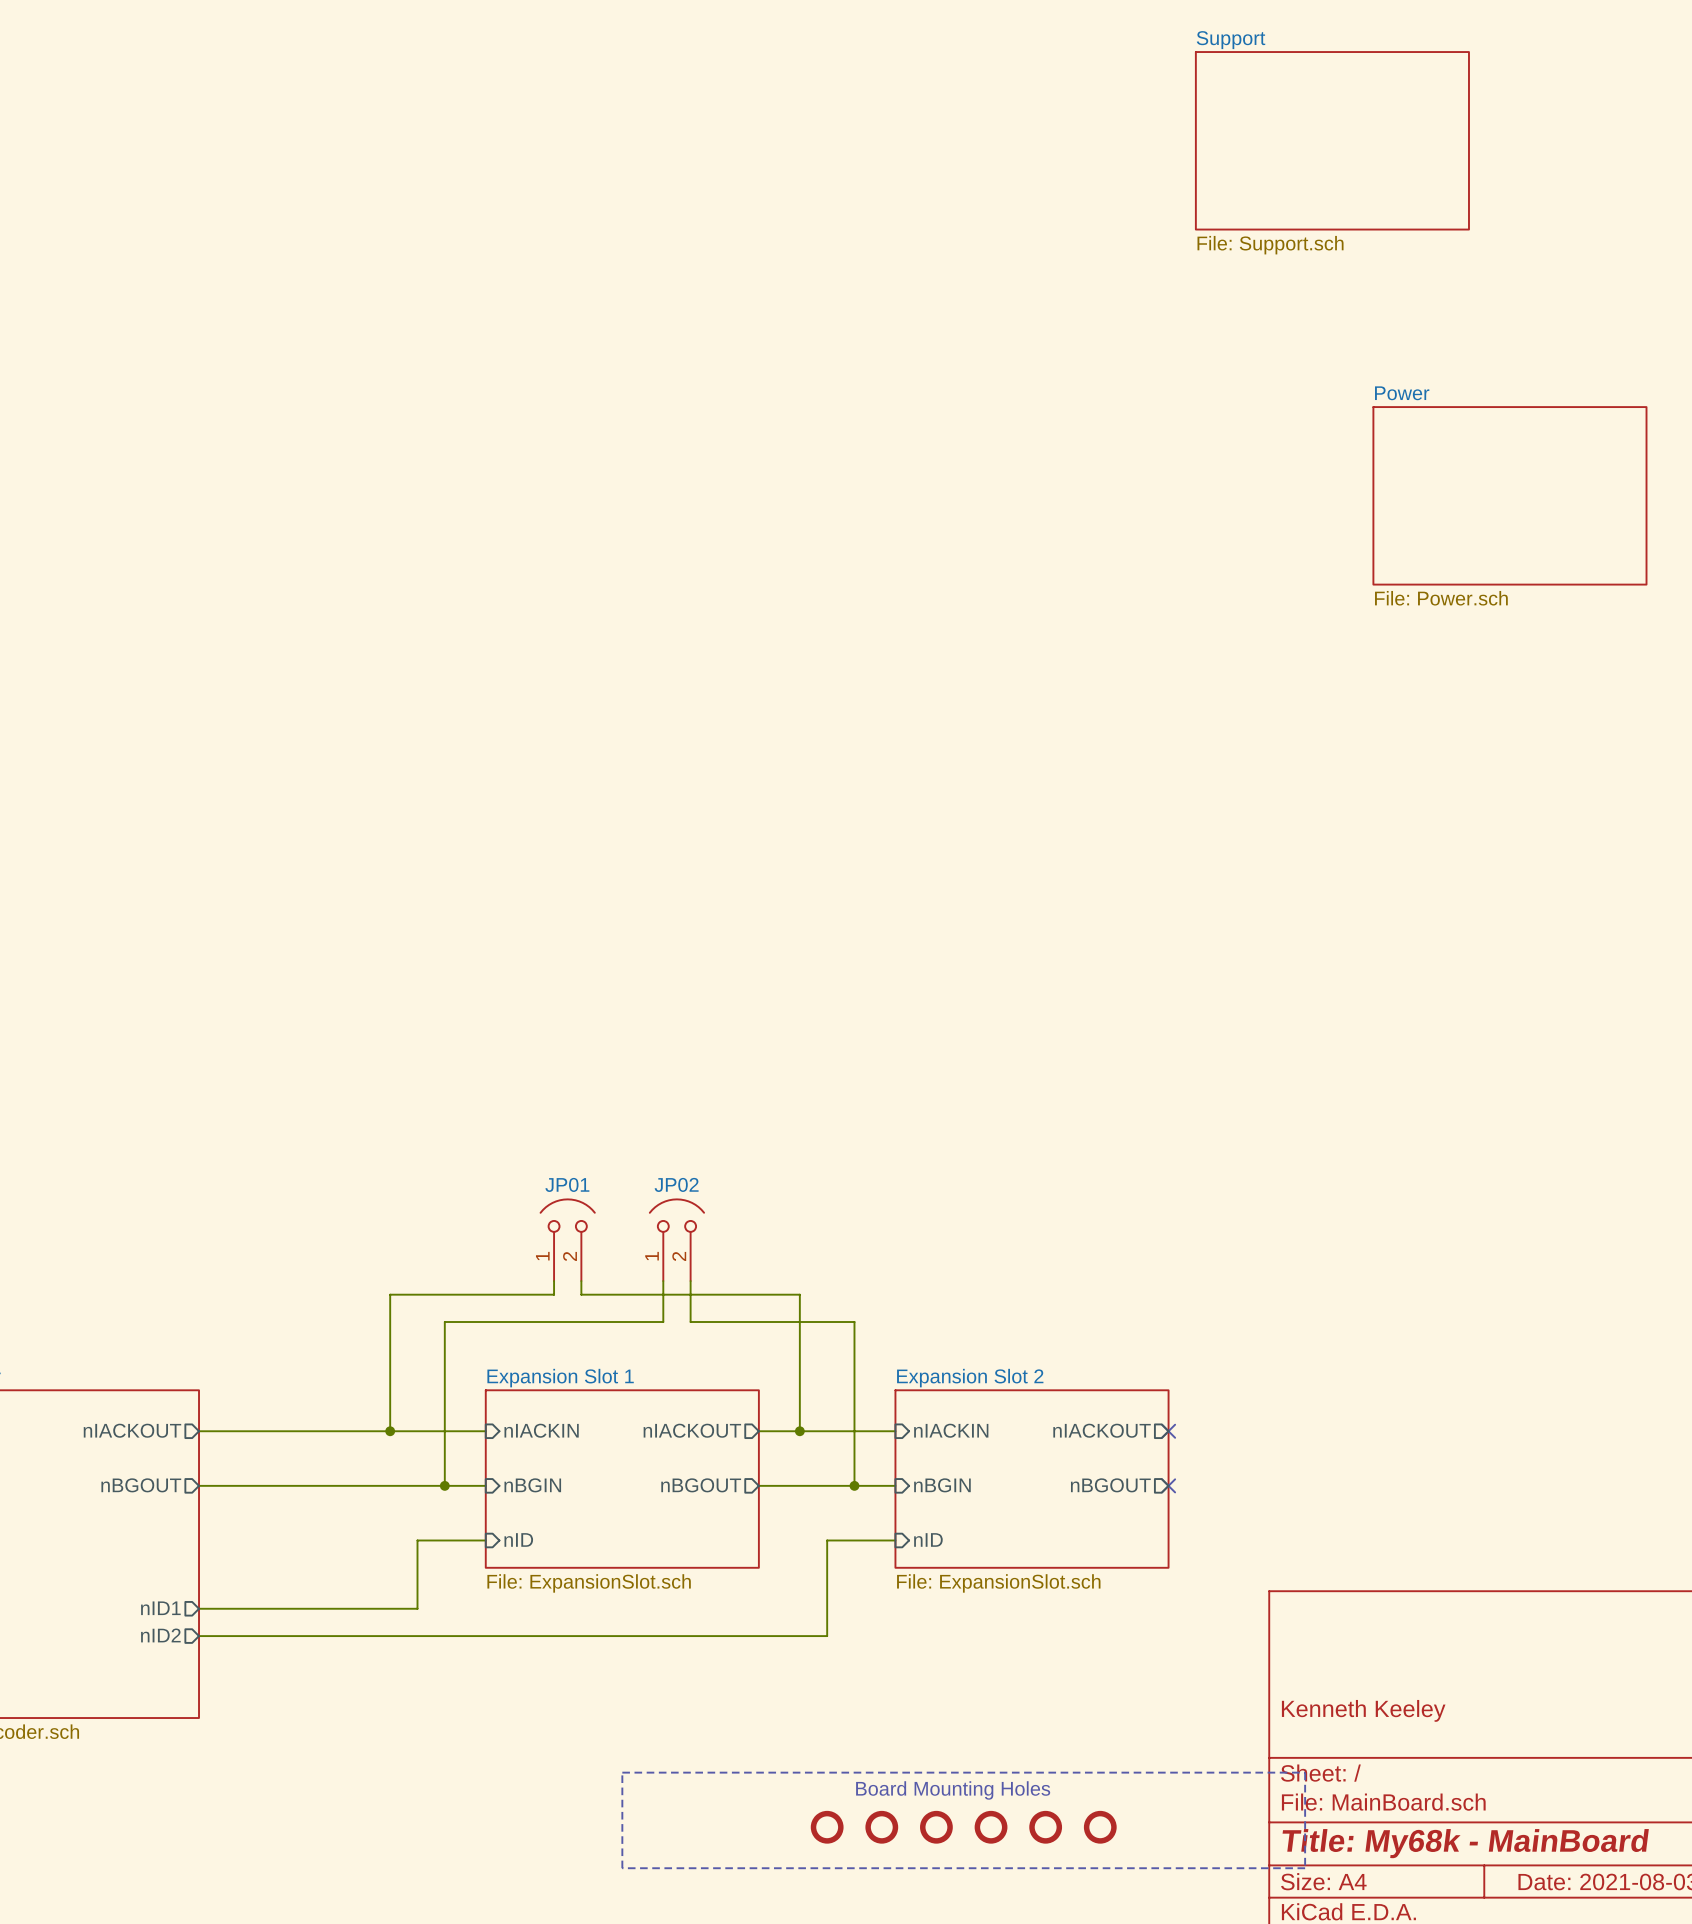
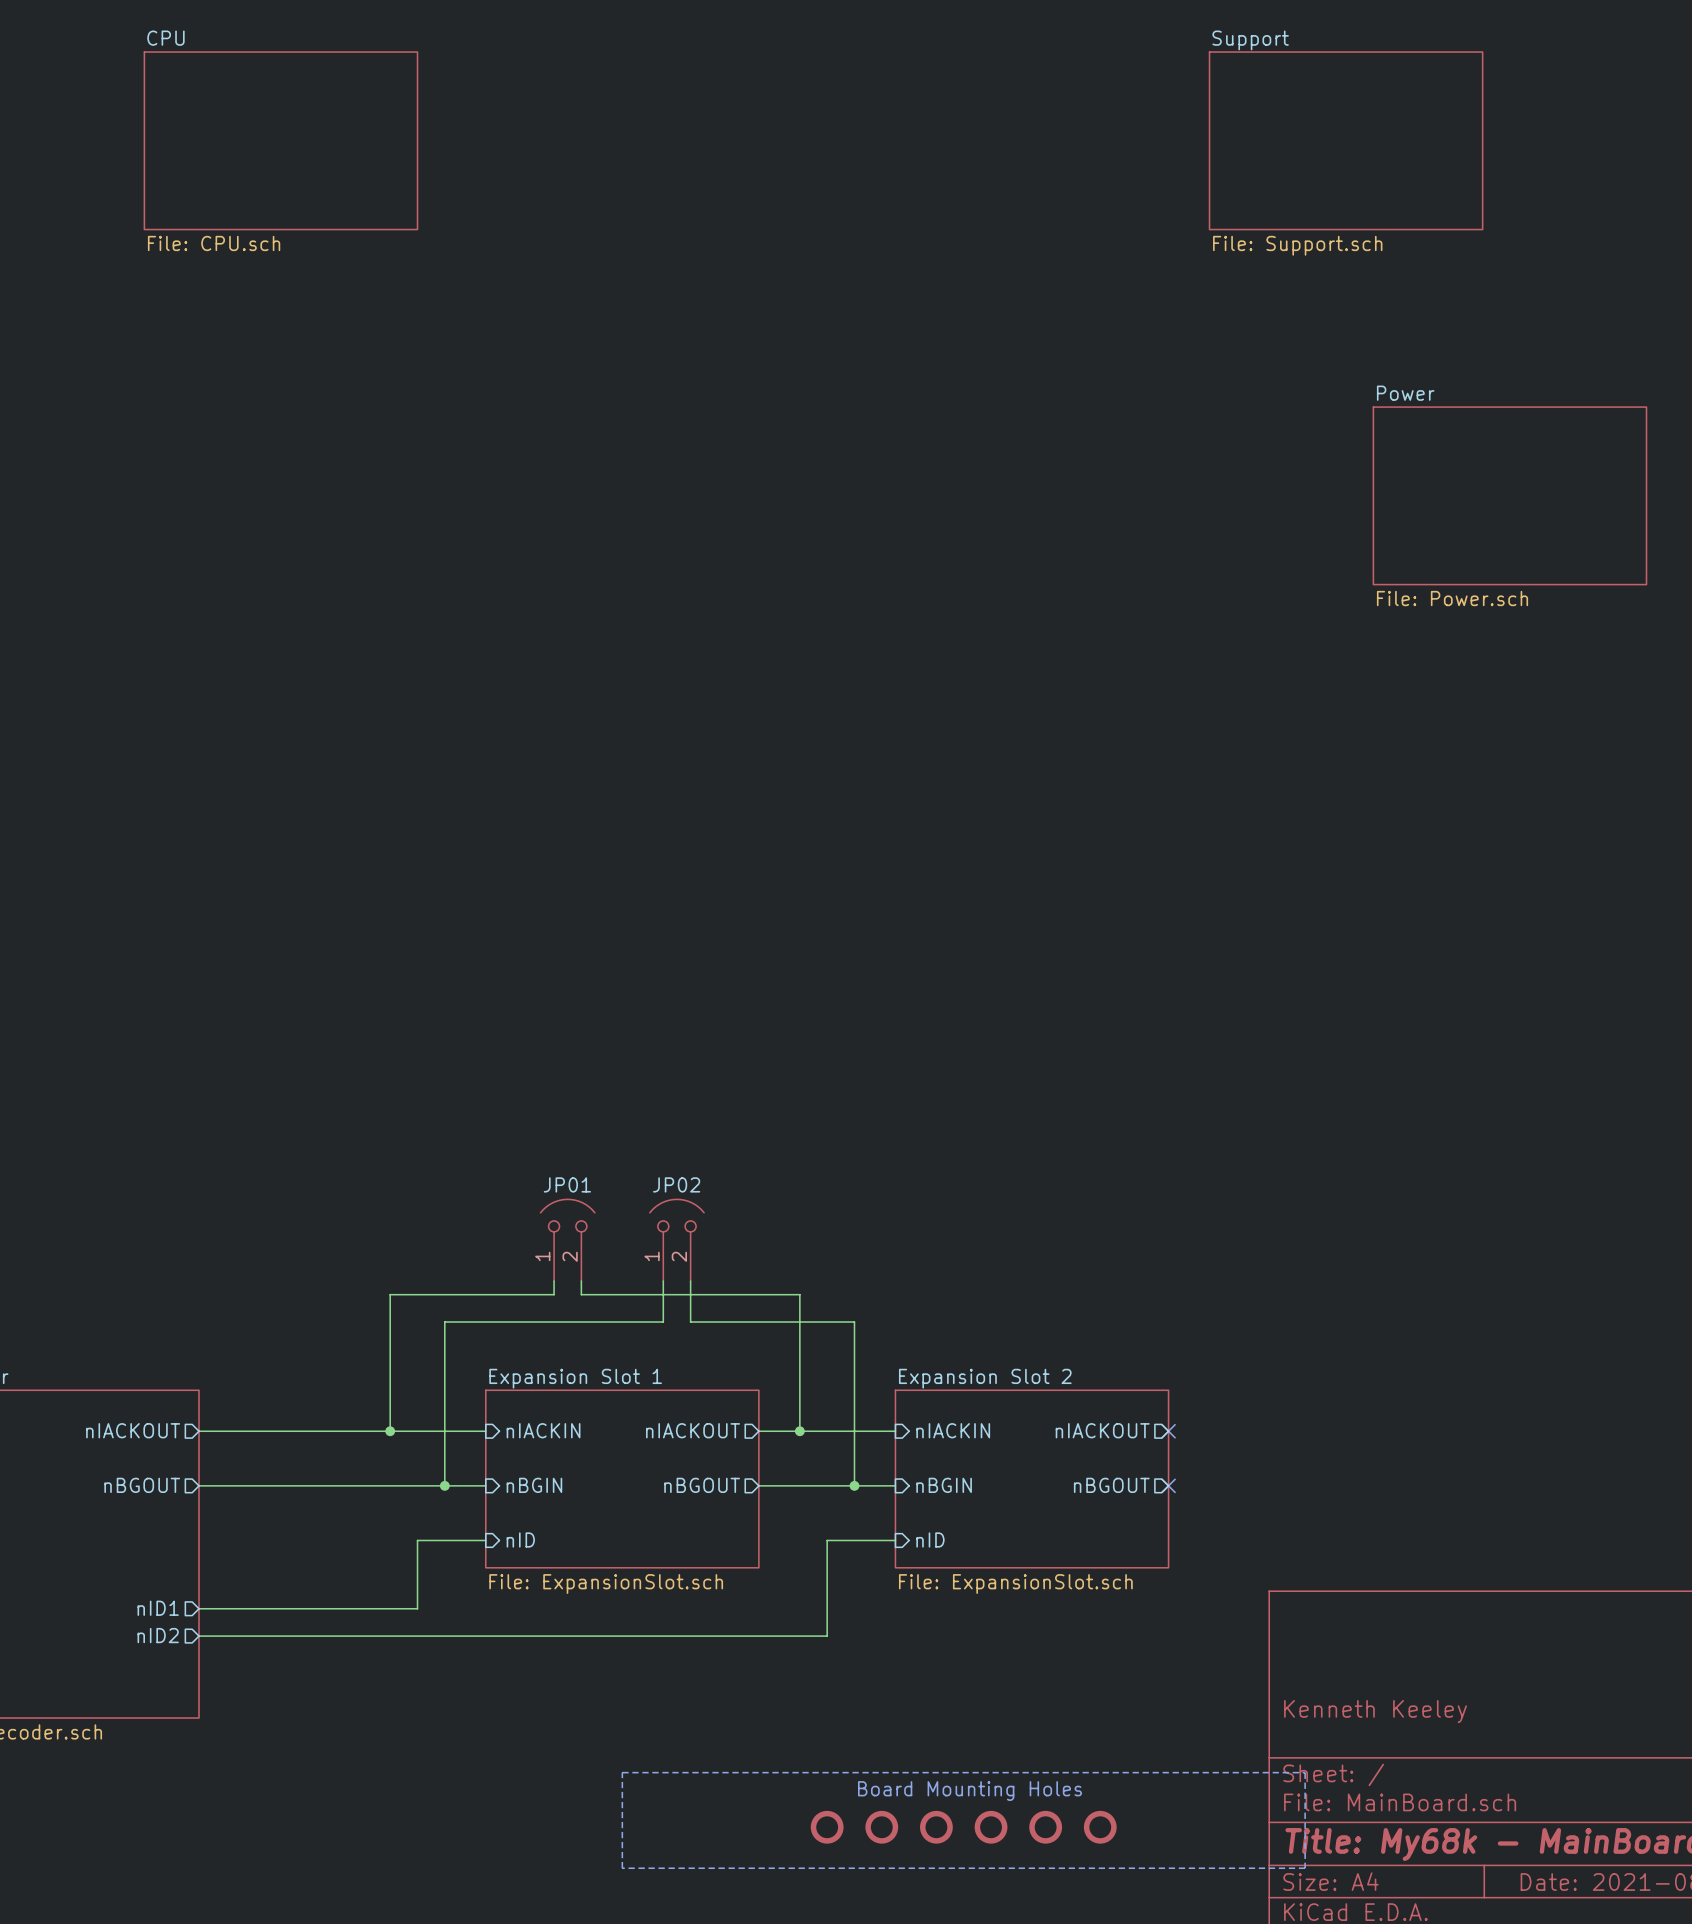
sheet CPU: none -> File: CPU.sch (280, 140)
sheet Support position: (1332, 140) -> (1346, 140)

